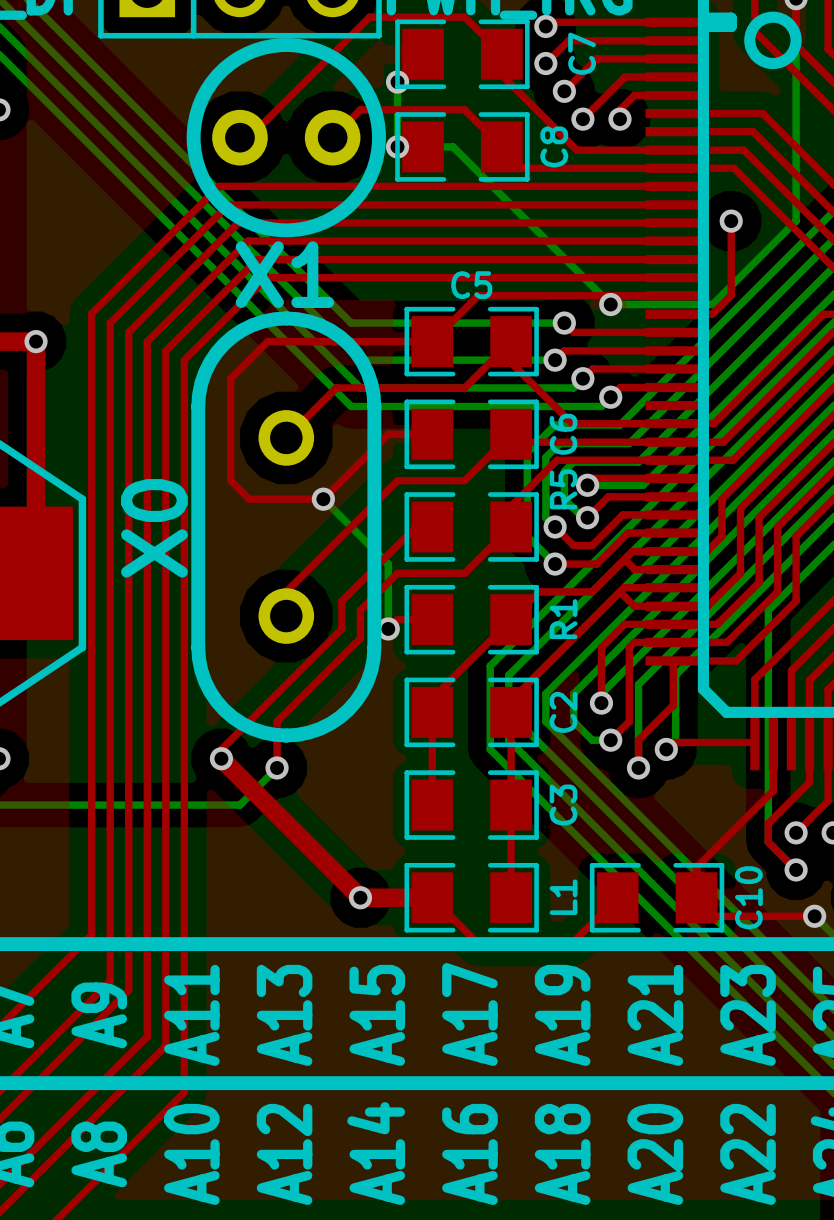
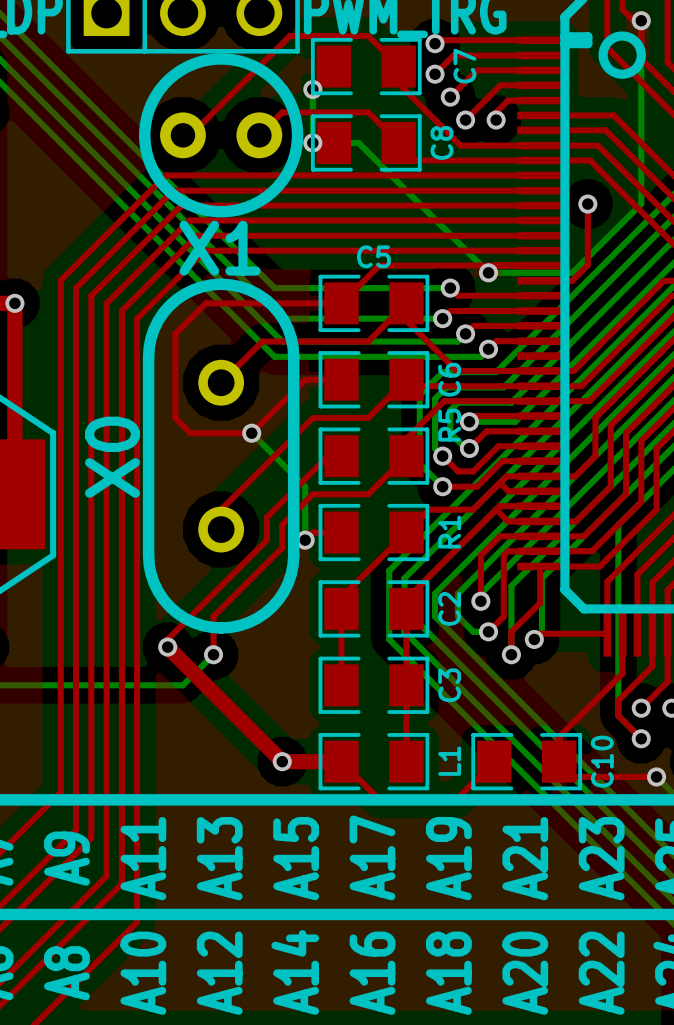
top track: (740, 480) (721, 499) (721, 536) (706, 551) -> (595, 456) (575, 476) (567, 476)
top track: (759, 489) (740, 508) -> (595, 417) (595, 440)
top track: (777, 499) (759, 517) -> (610, 425) (610, 448)
top track: (796, 508) (777, 526) -> (626, 433) (626, 456)
top track: (814, 517) (796, 536) -> (641, 440) (641, 463)
top track: none -> (656, 448) (656, 509) (599, 566) (592, 566)
top track: (740, 526) (740, 573) (707, 606) -> none
top track: (759, 564) (759, 582) (717, 624) -> (610, 486) (575, 521) (568, 521)
top track: (777, 573) (777, 591) (727, 642) -> (626, 494) (583, 536) (576, 536)
top track: (796, 582) (796, 601) (736, 660) -> (641, 501) (592, 551) (584, 551)

